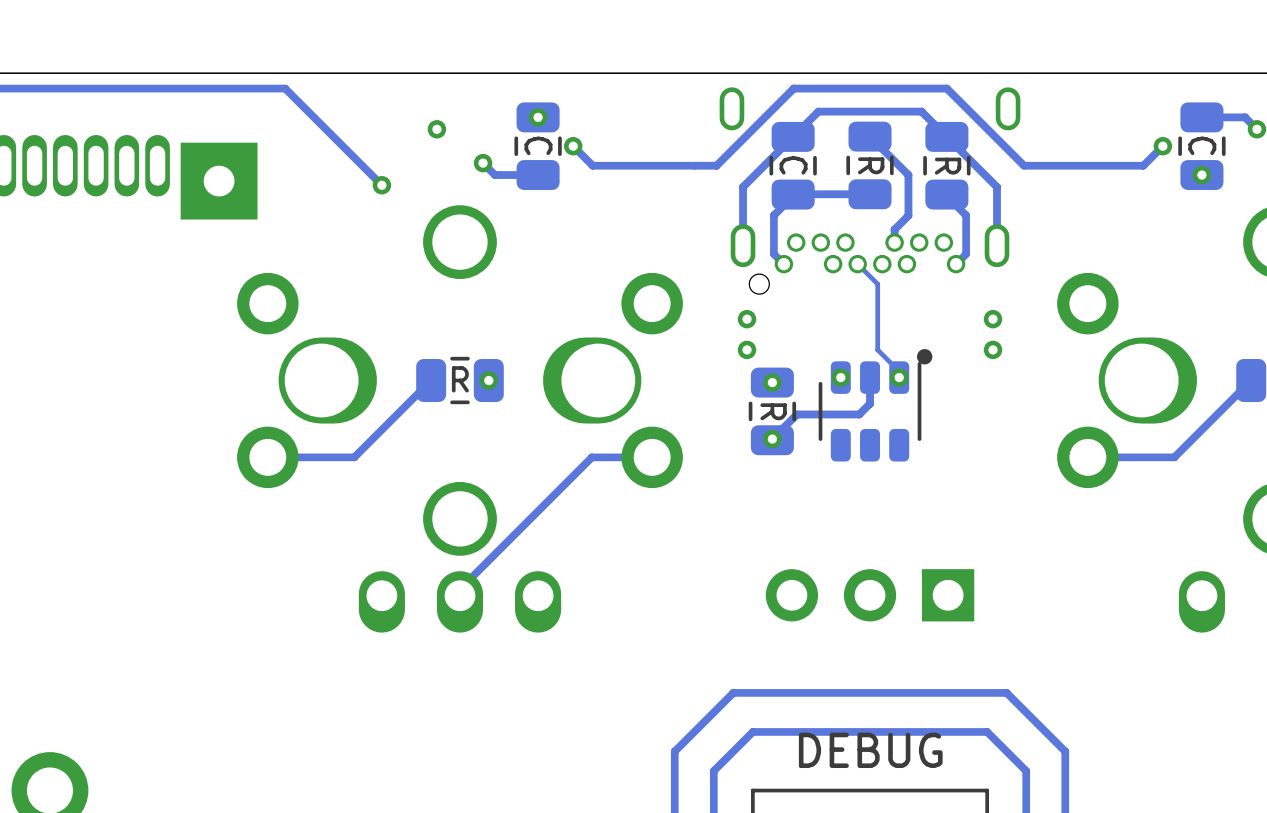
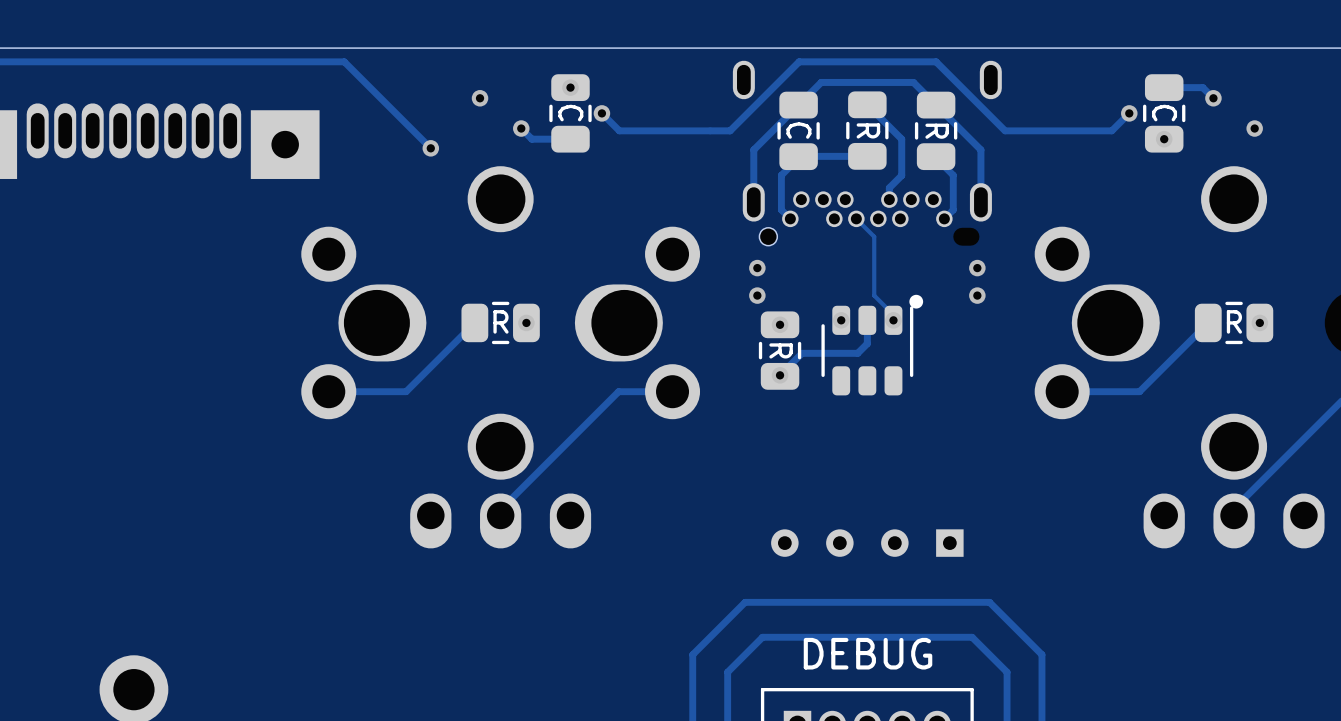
part: (870, 595) -> none
part: none -> (784, 543)
part: none -> (839, 543)
part: none -> (894, 543)
part: none -> (949, 543)

